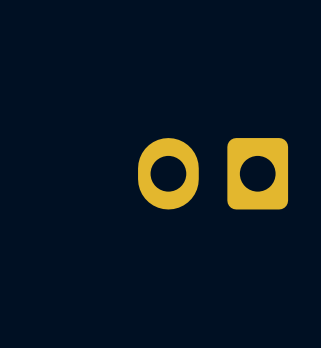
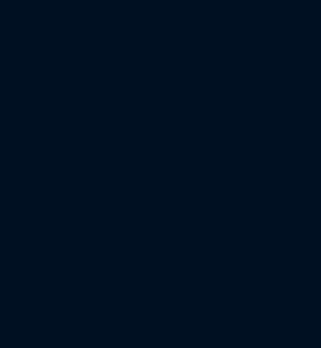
part: (213, 173) -> none

